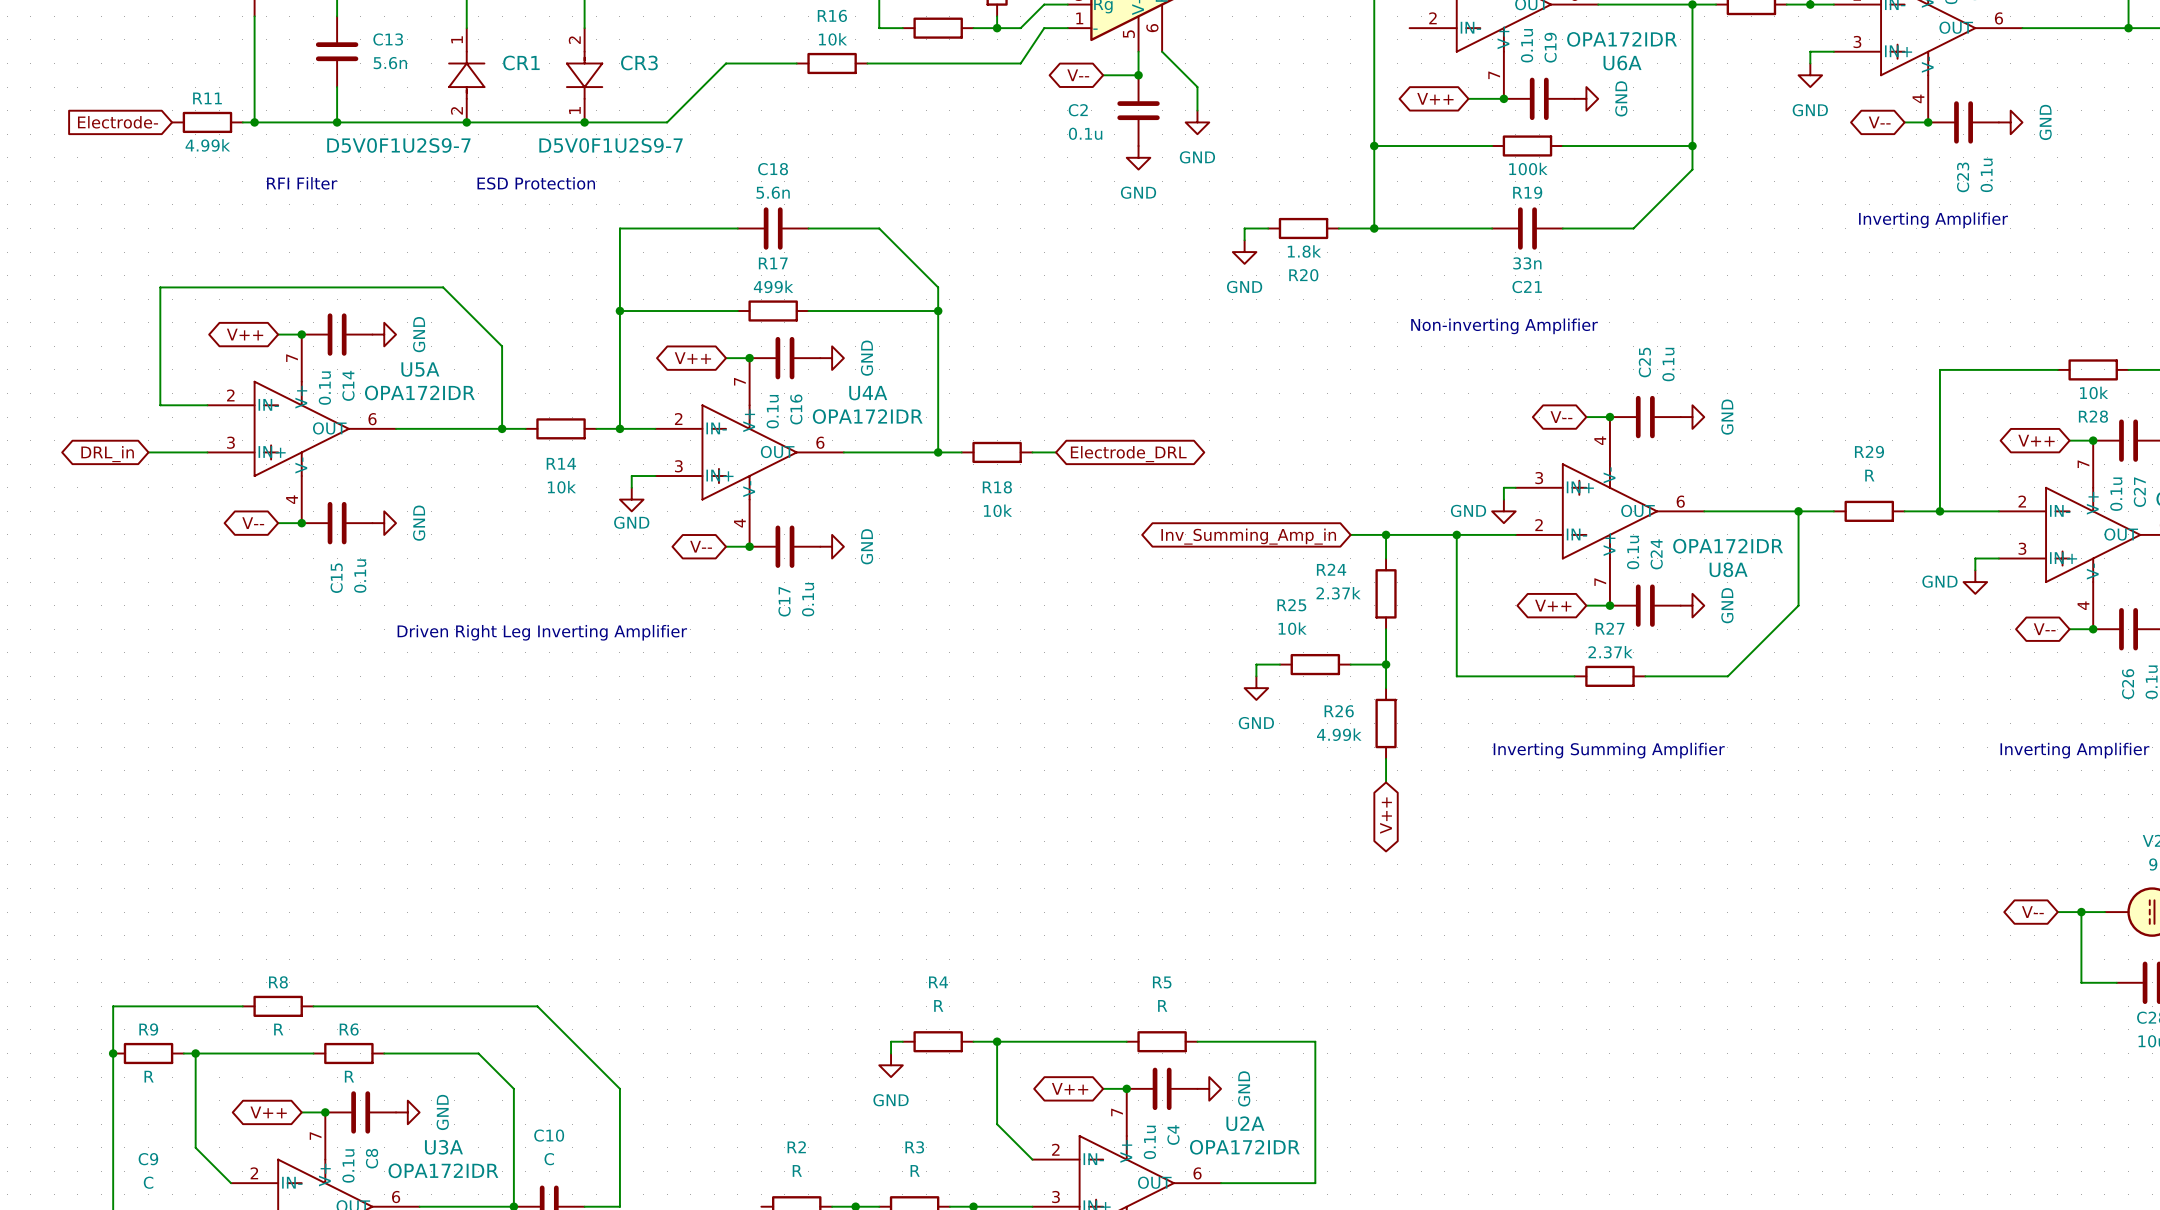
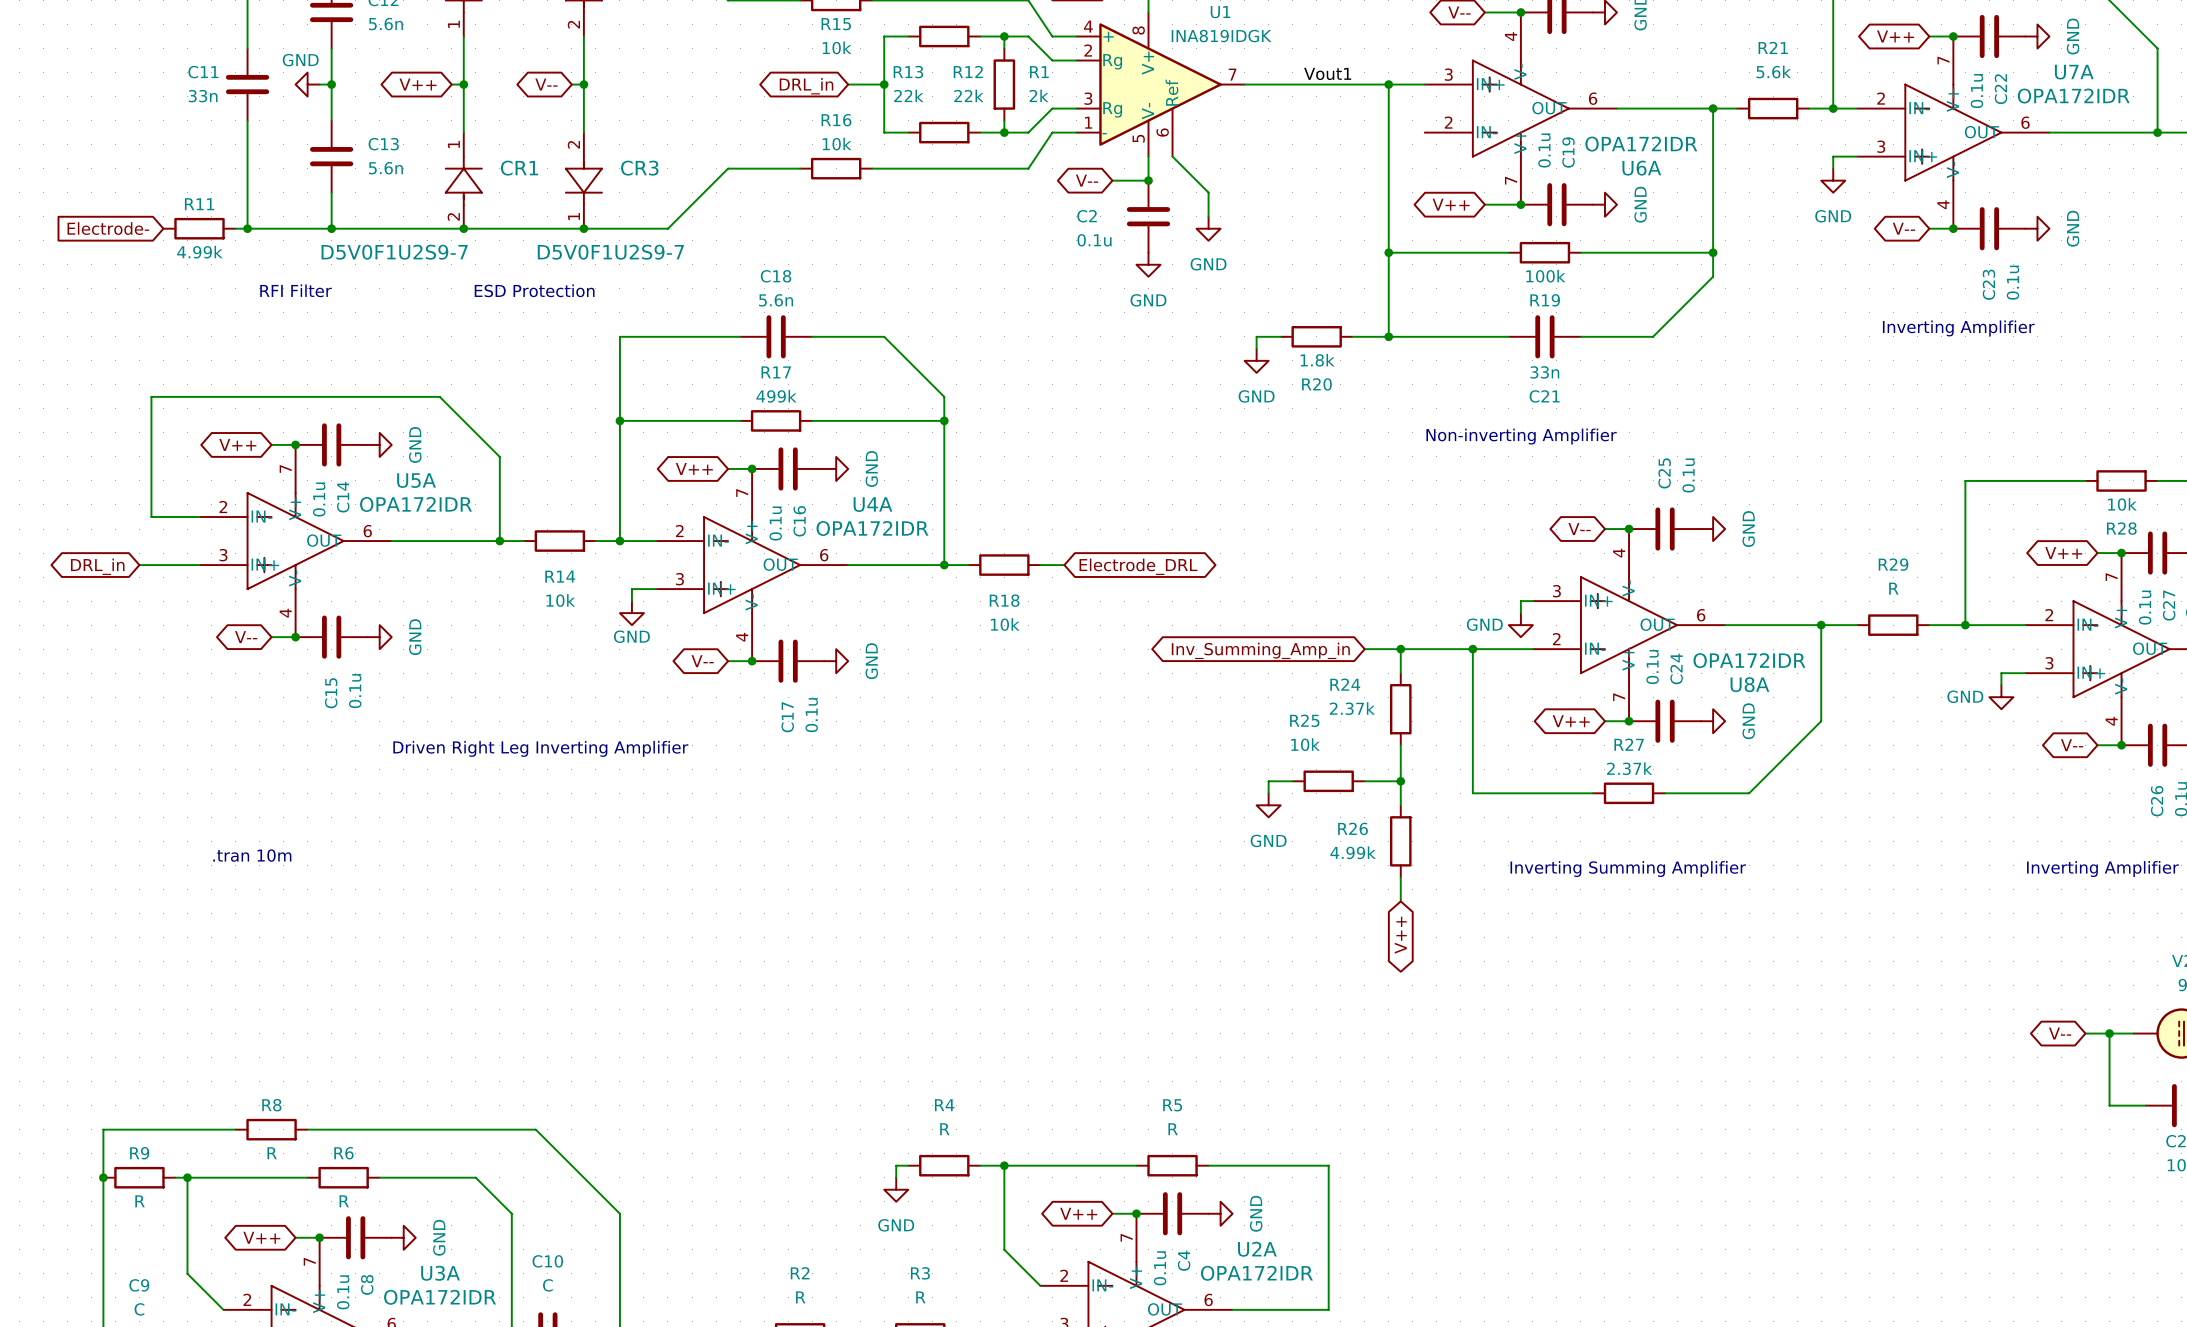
text: none -> .tran 10m (252, 855)

